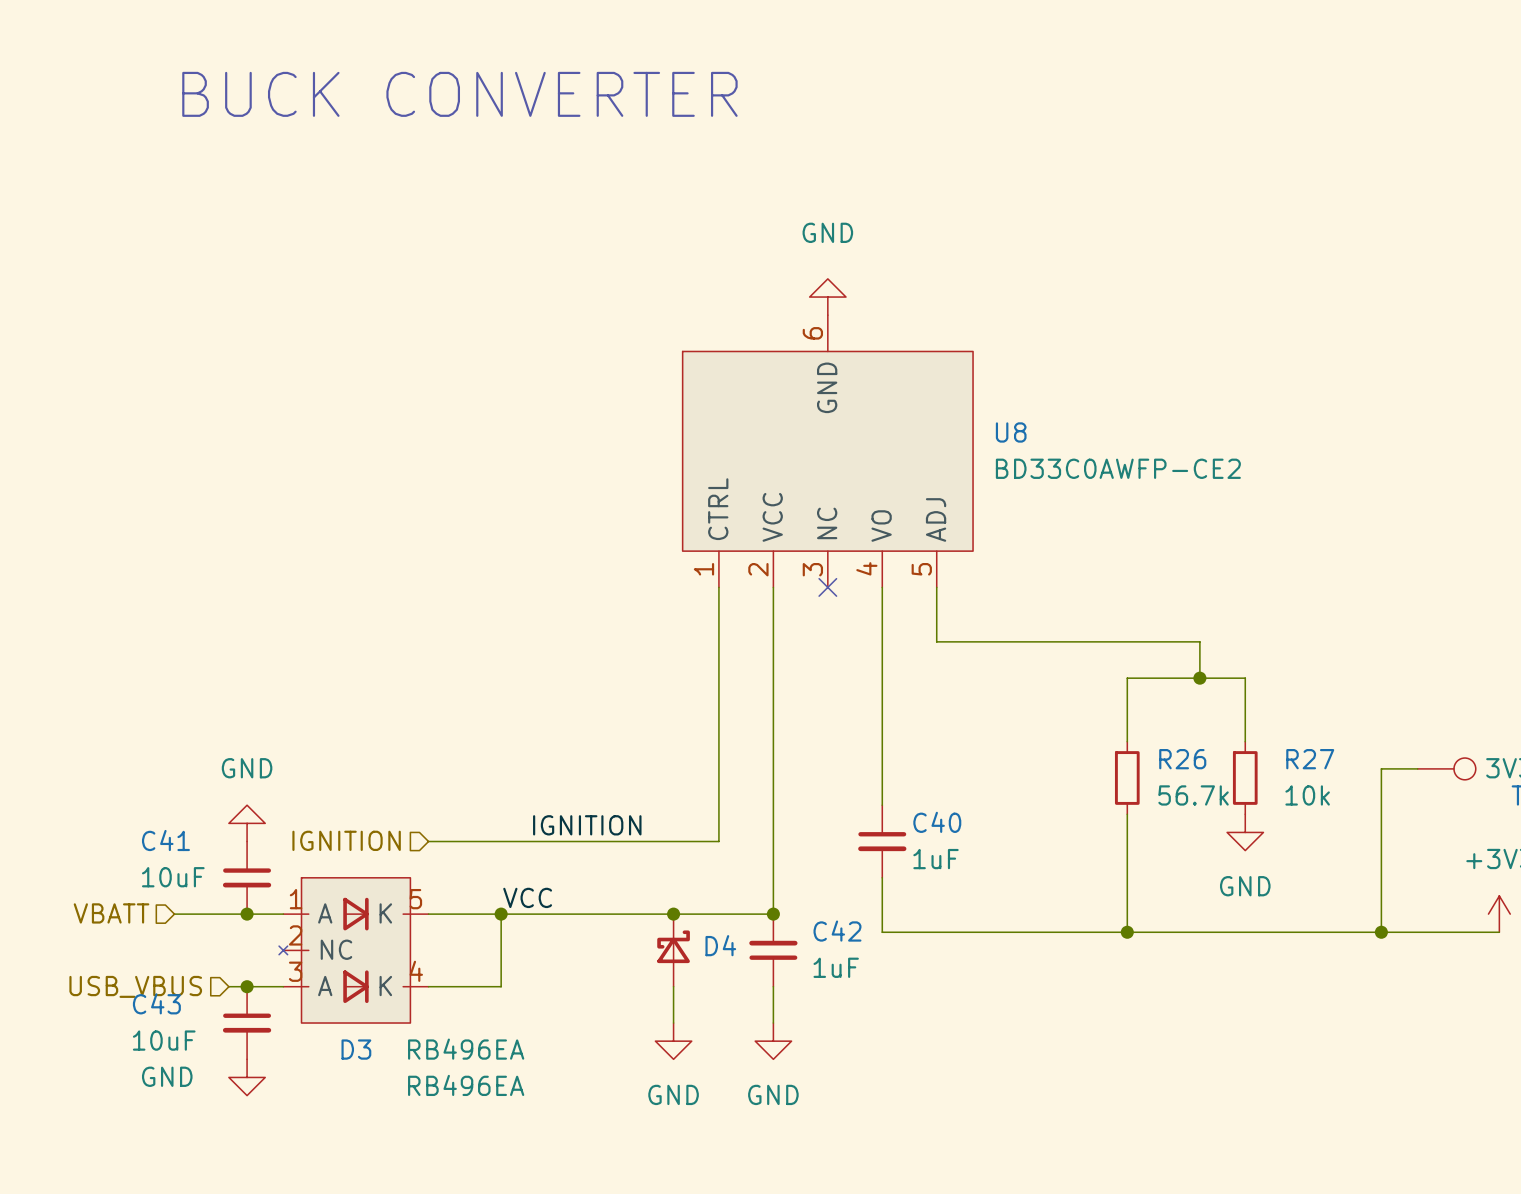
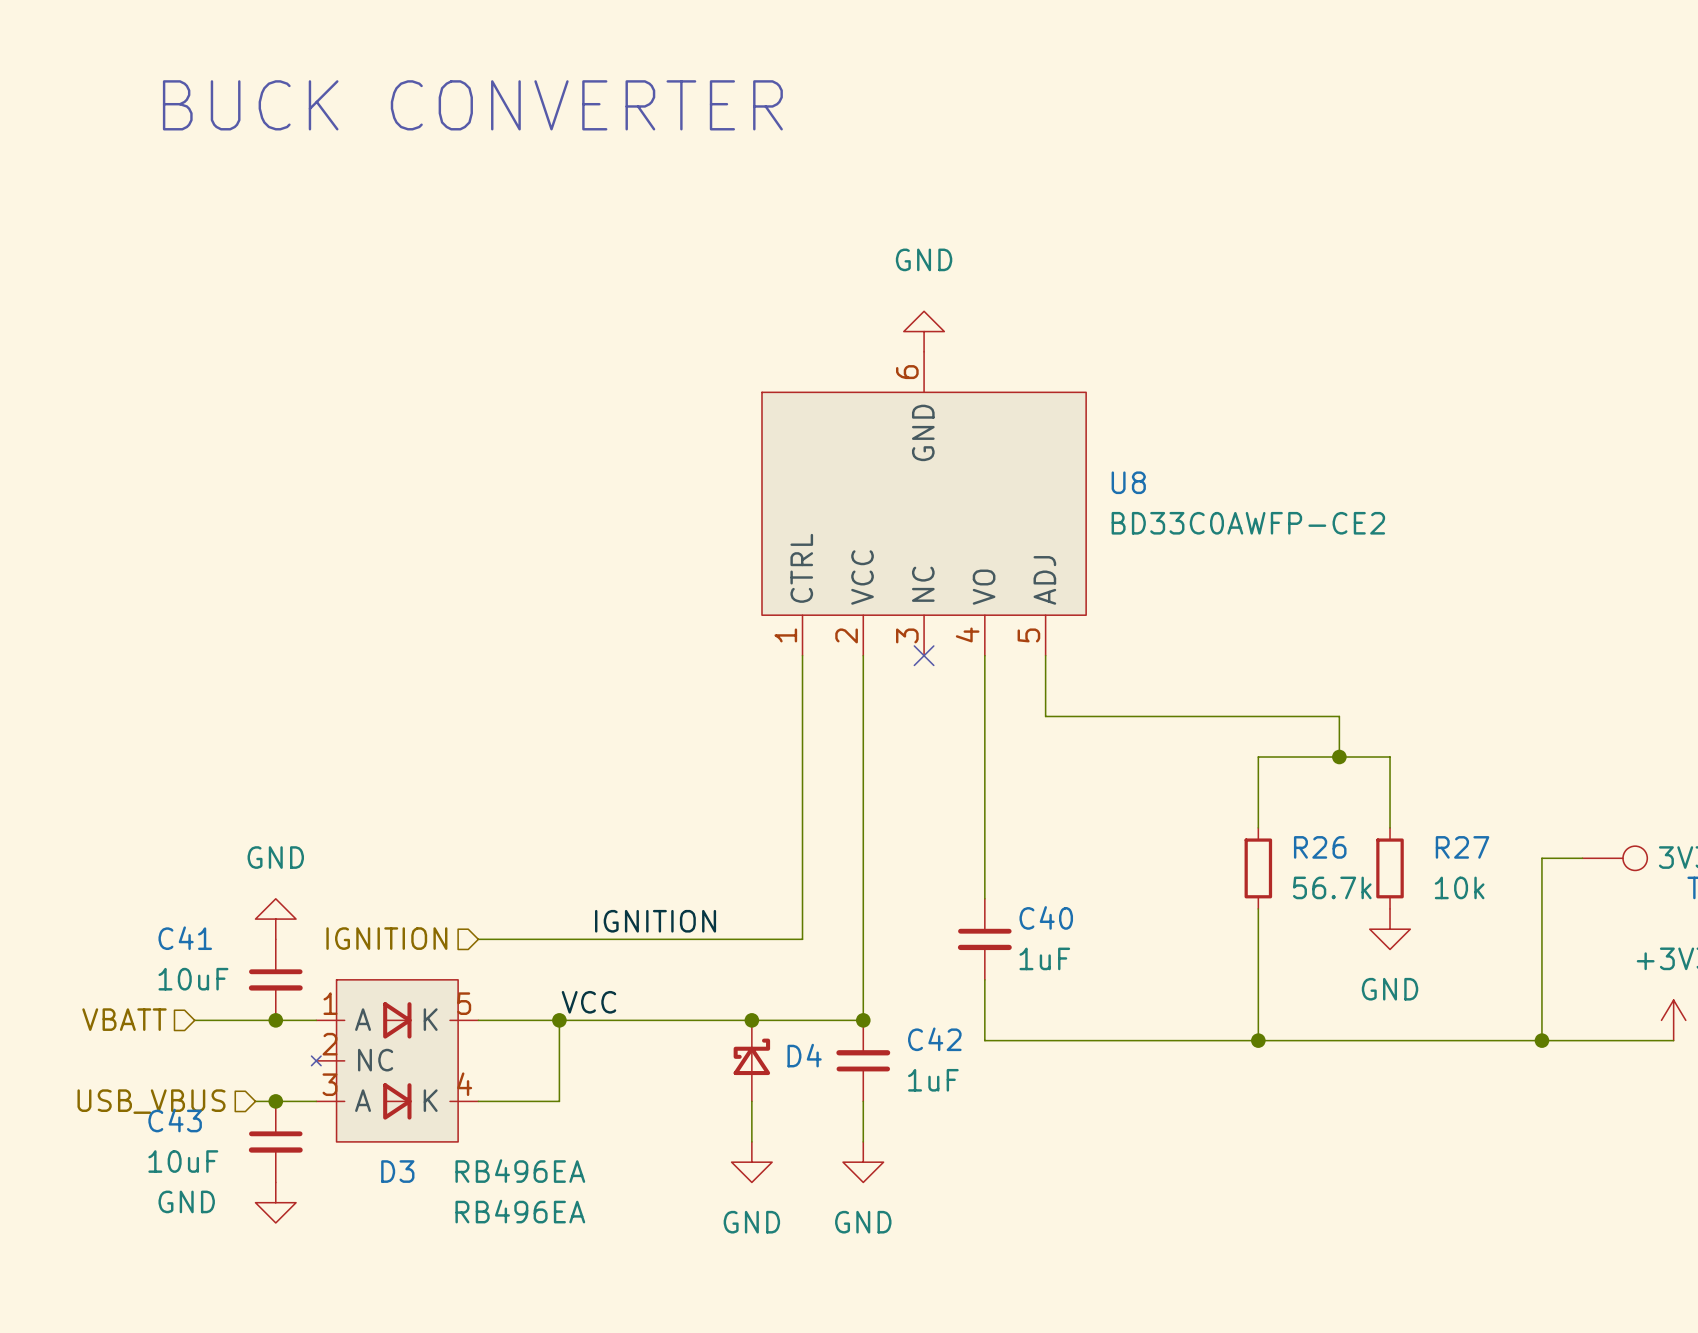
text position: BUCK CONVERTER (459, 94) -> BUCK CONVERTER (472, 105)

